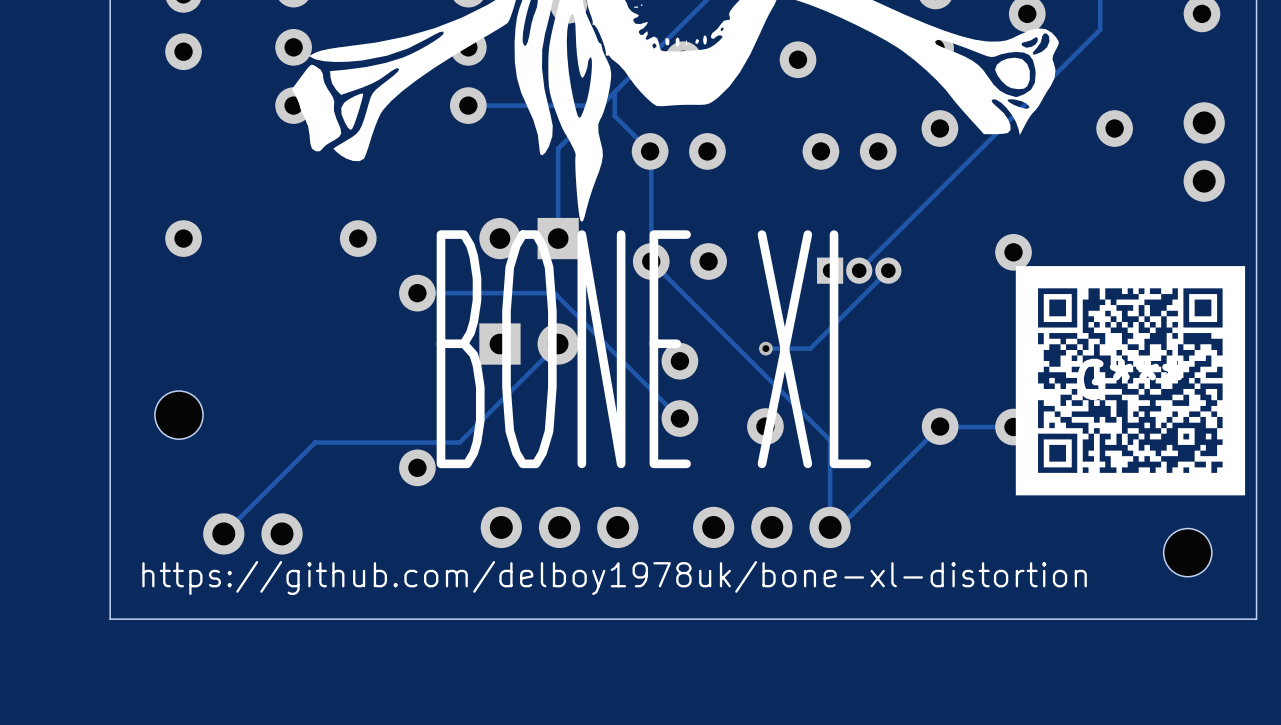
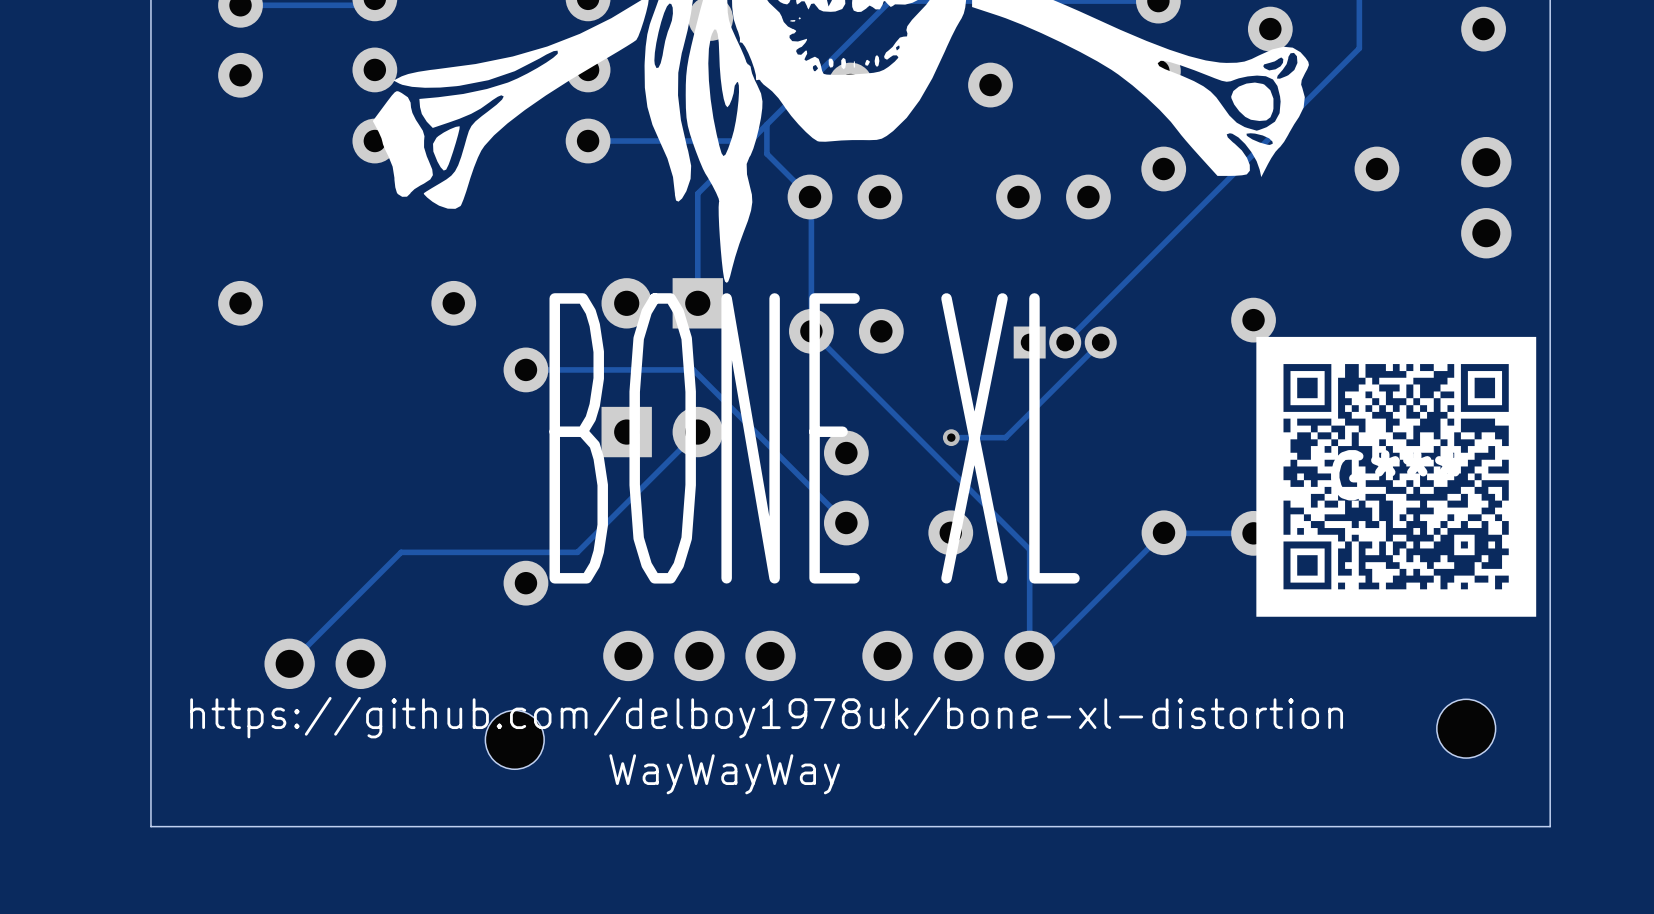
part position: (178, 415) -> (514, 739)
part position: (1187, 552) -> (1466, 728)
board edge: (1256, 619) (110, 619) -> (1550, 767) (1550, 826) (150, 826) (150, 767)
WayWayWay: none -> (724, 774)

